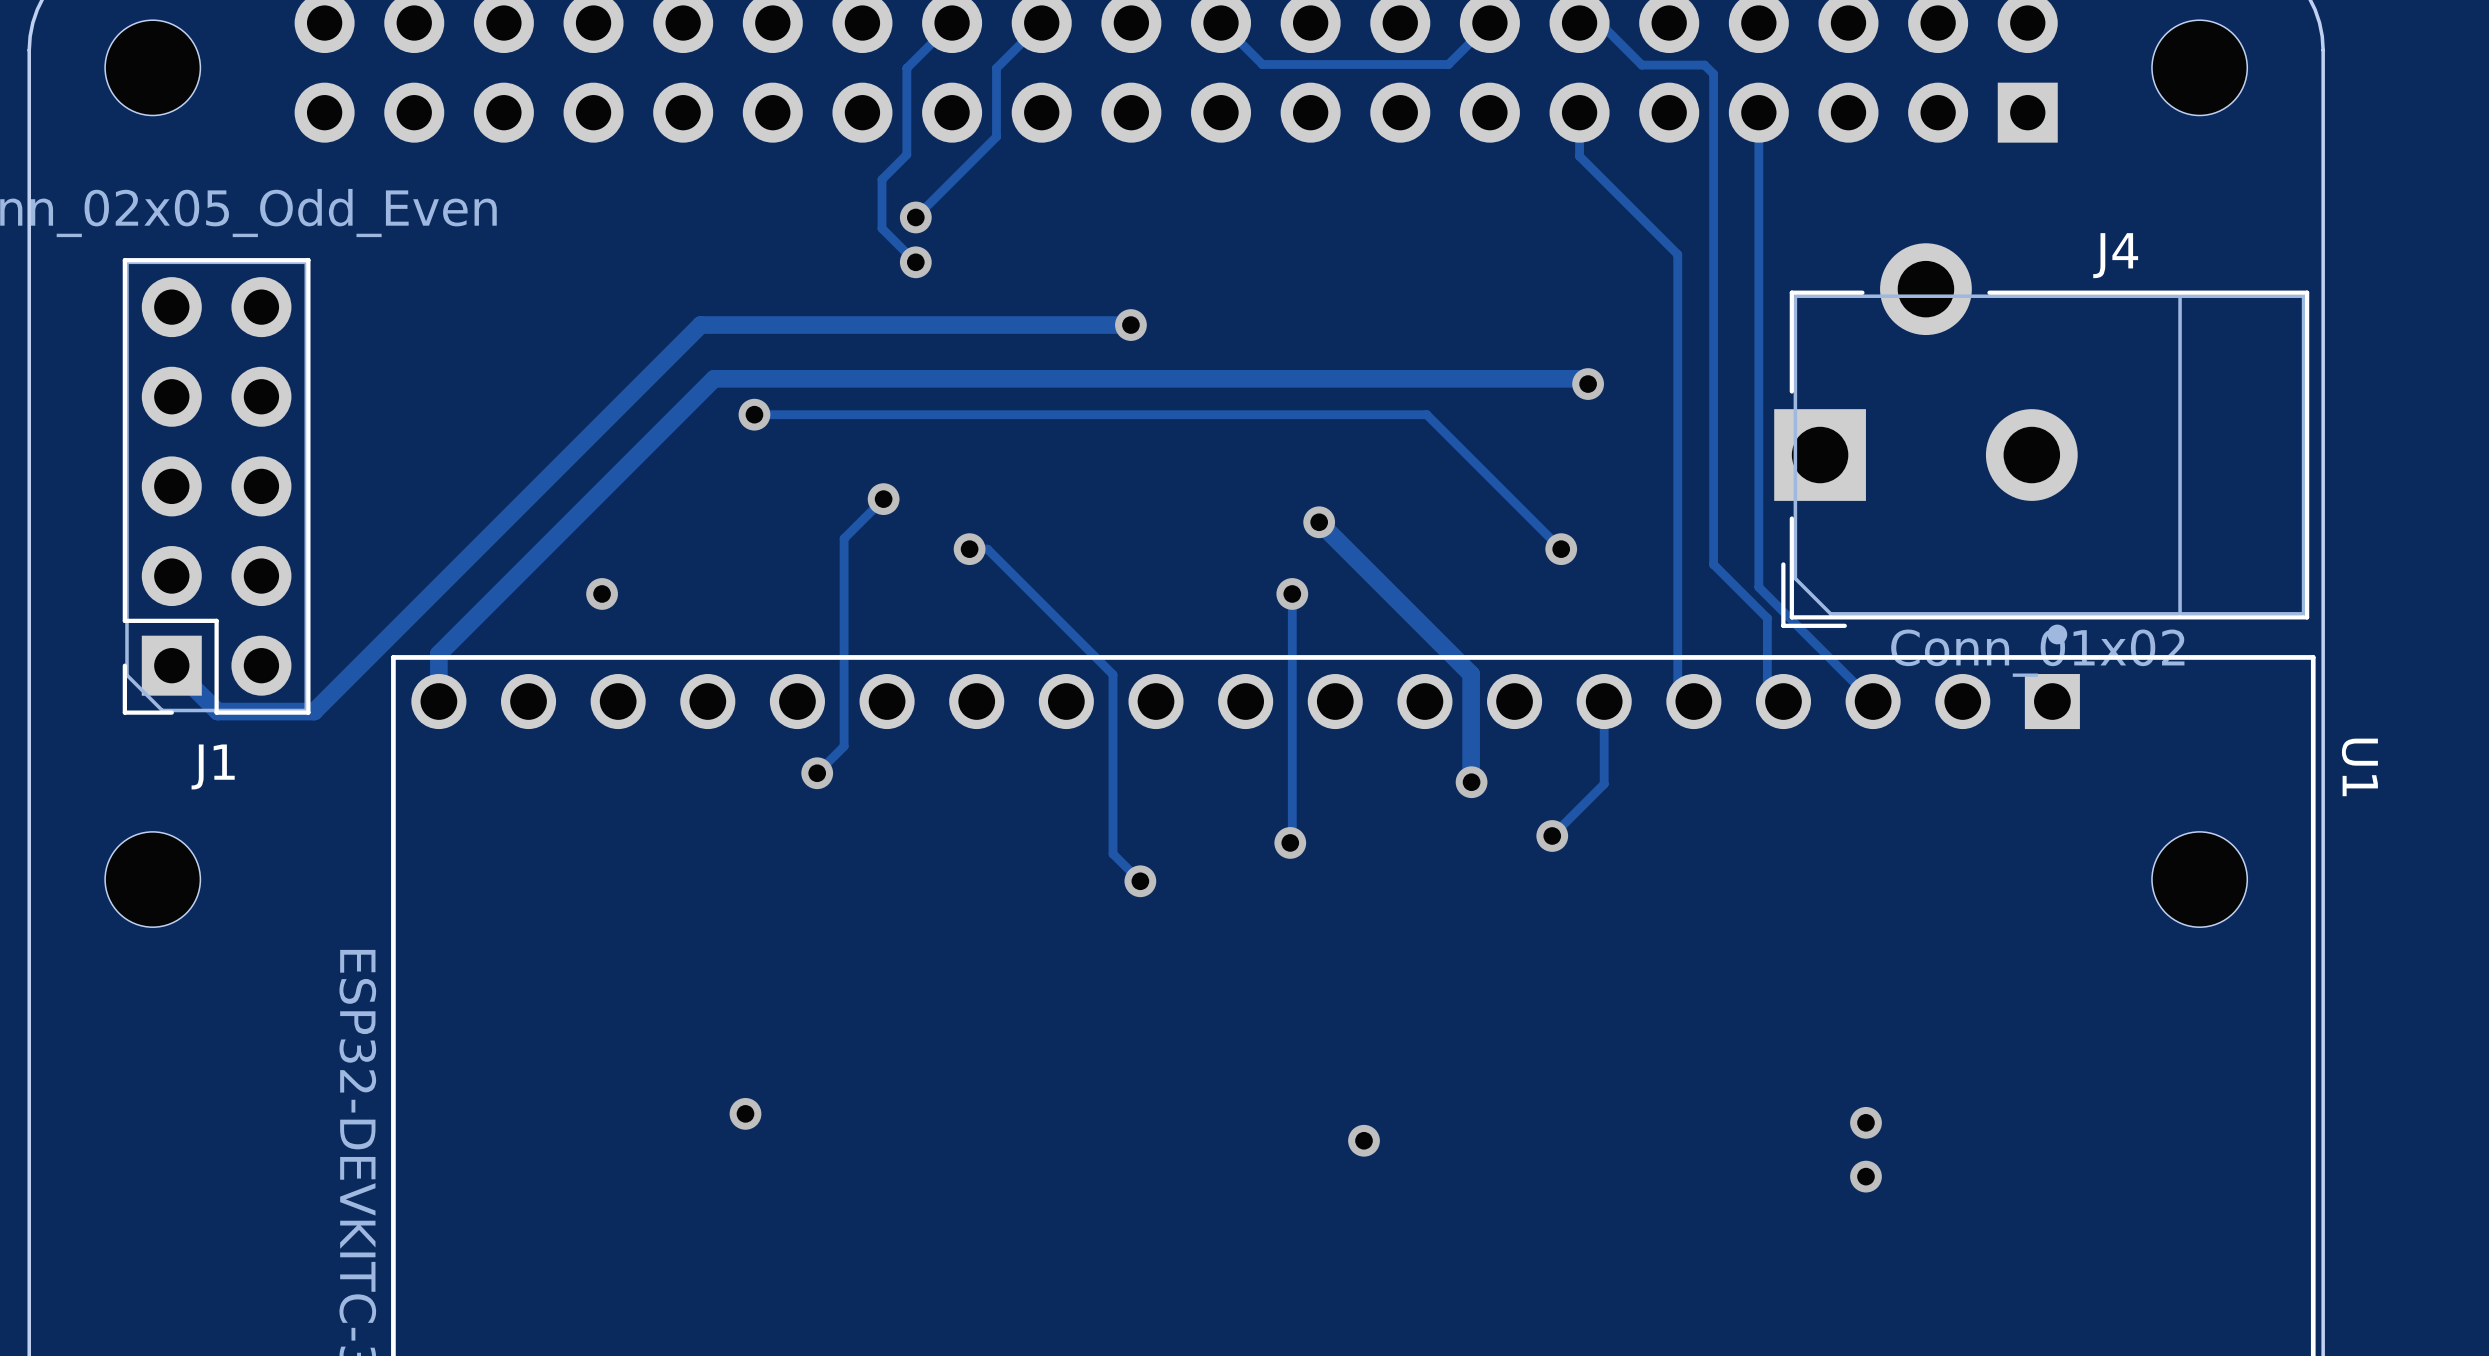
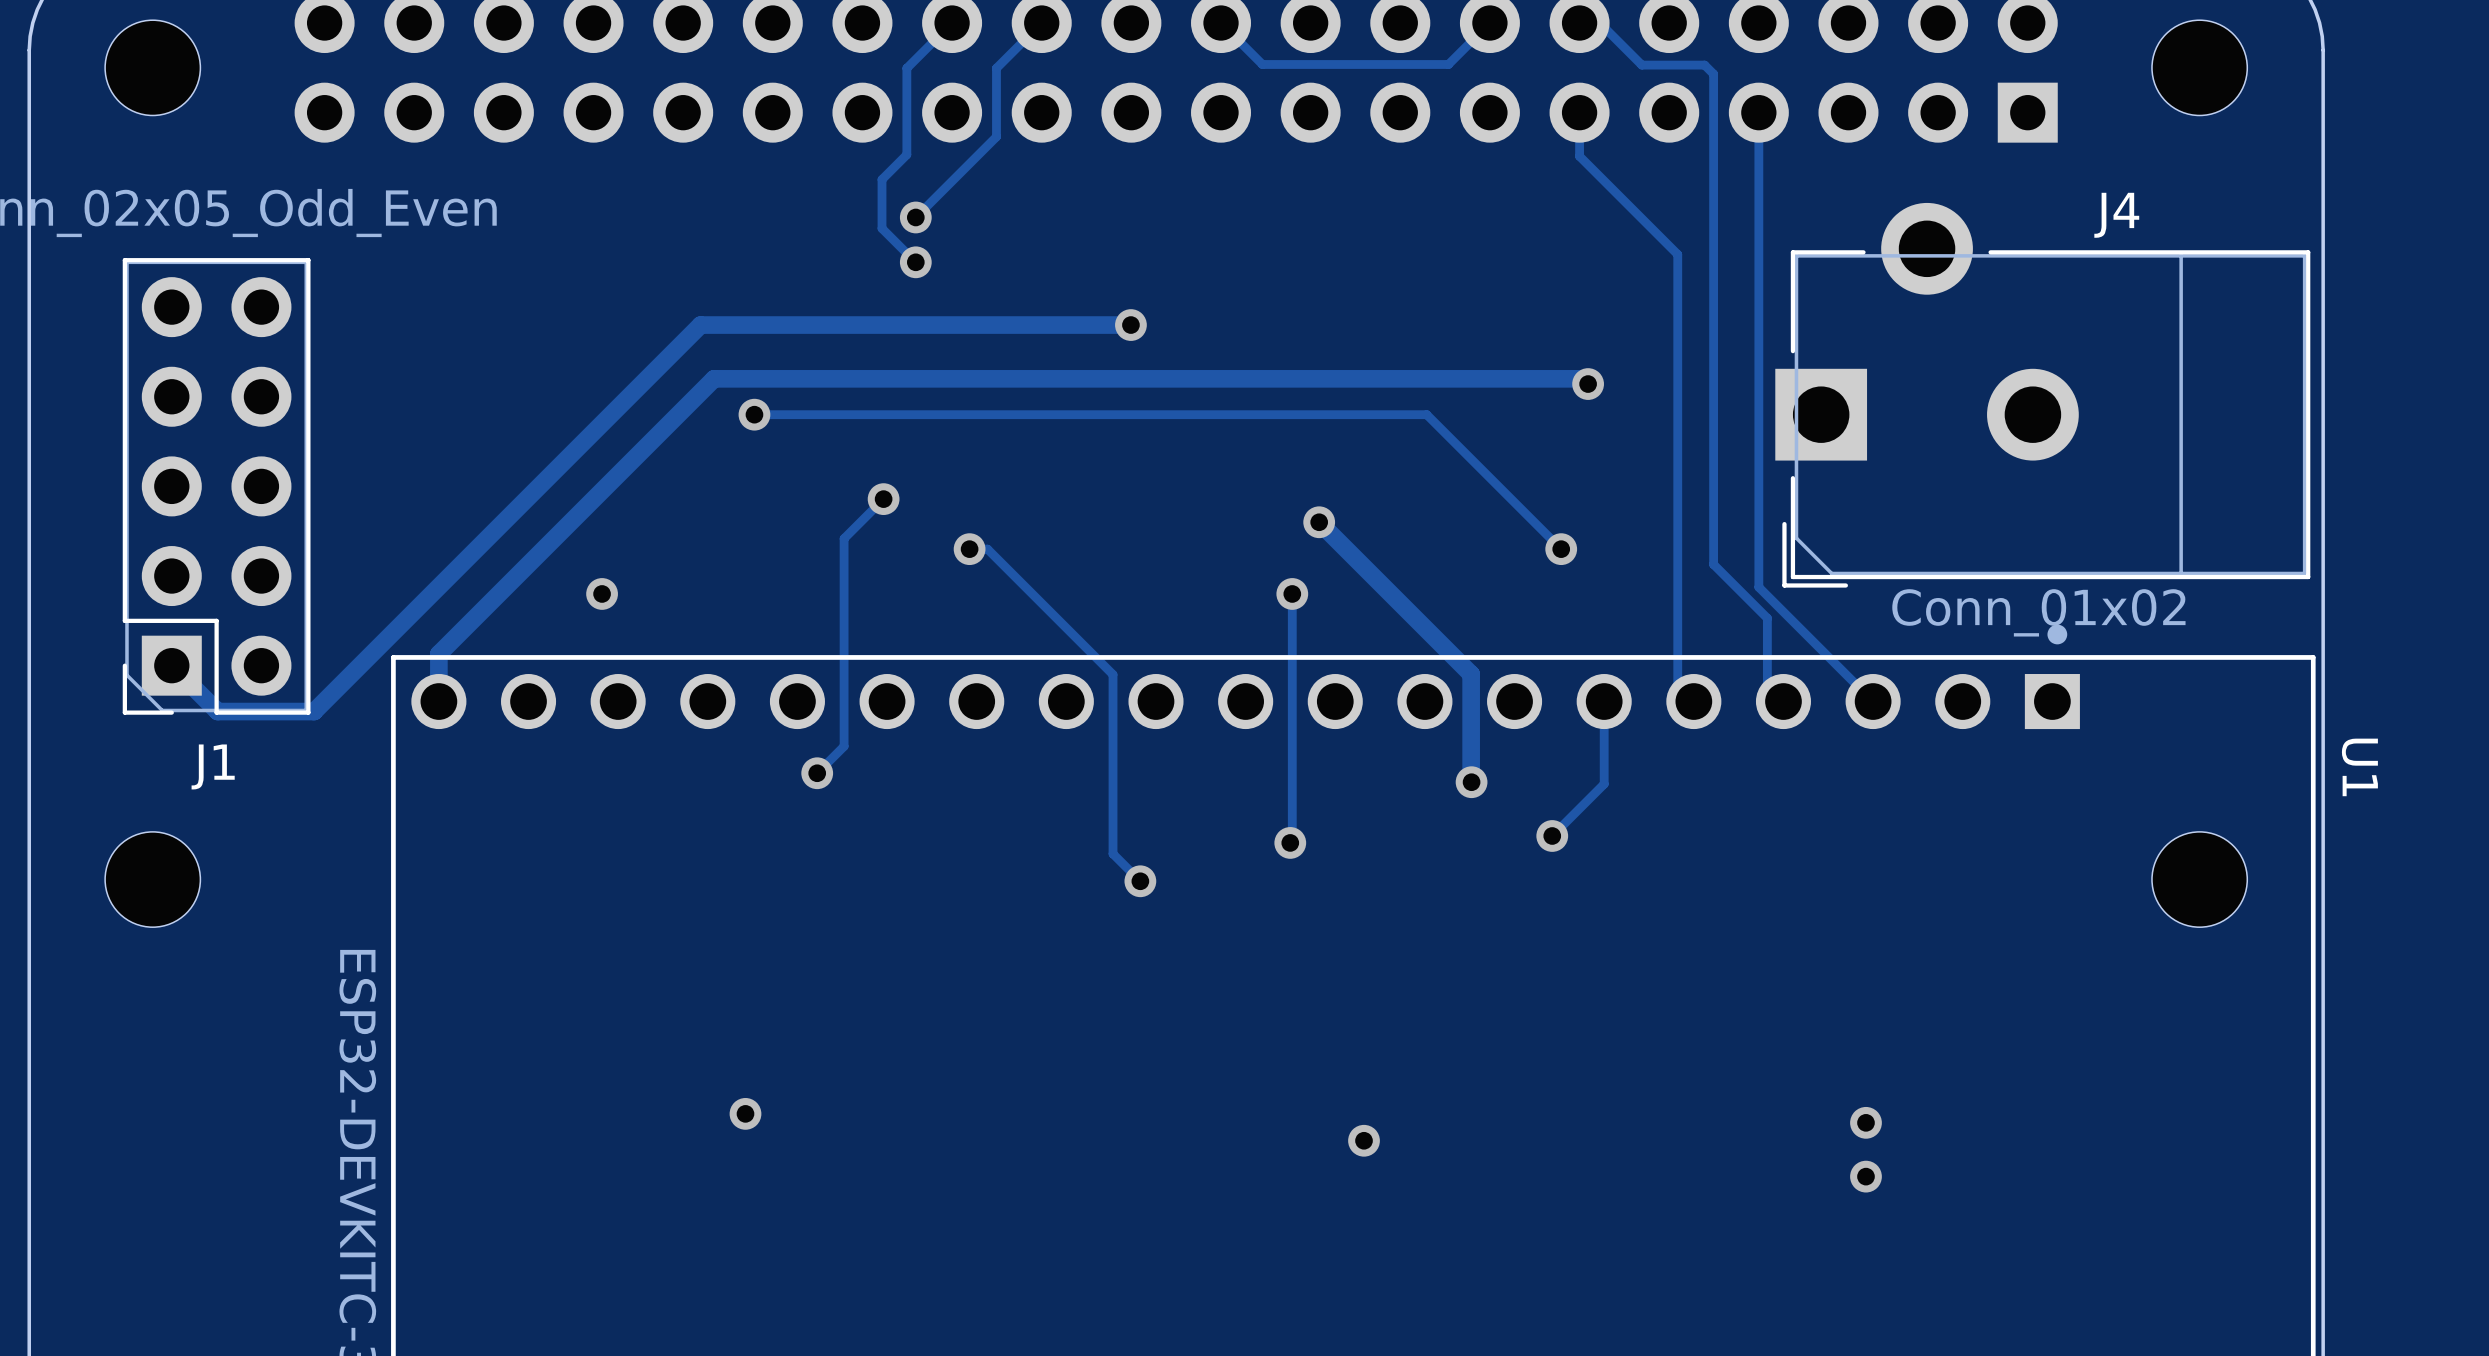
J4 position: (2041, 435) -> (2042, 395)

